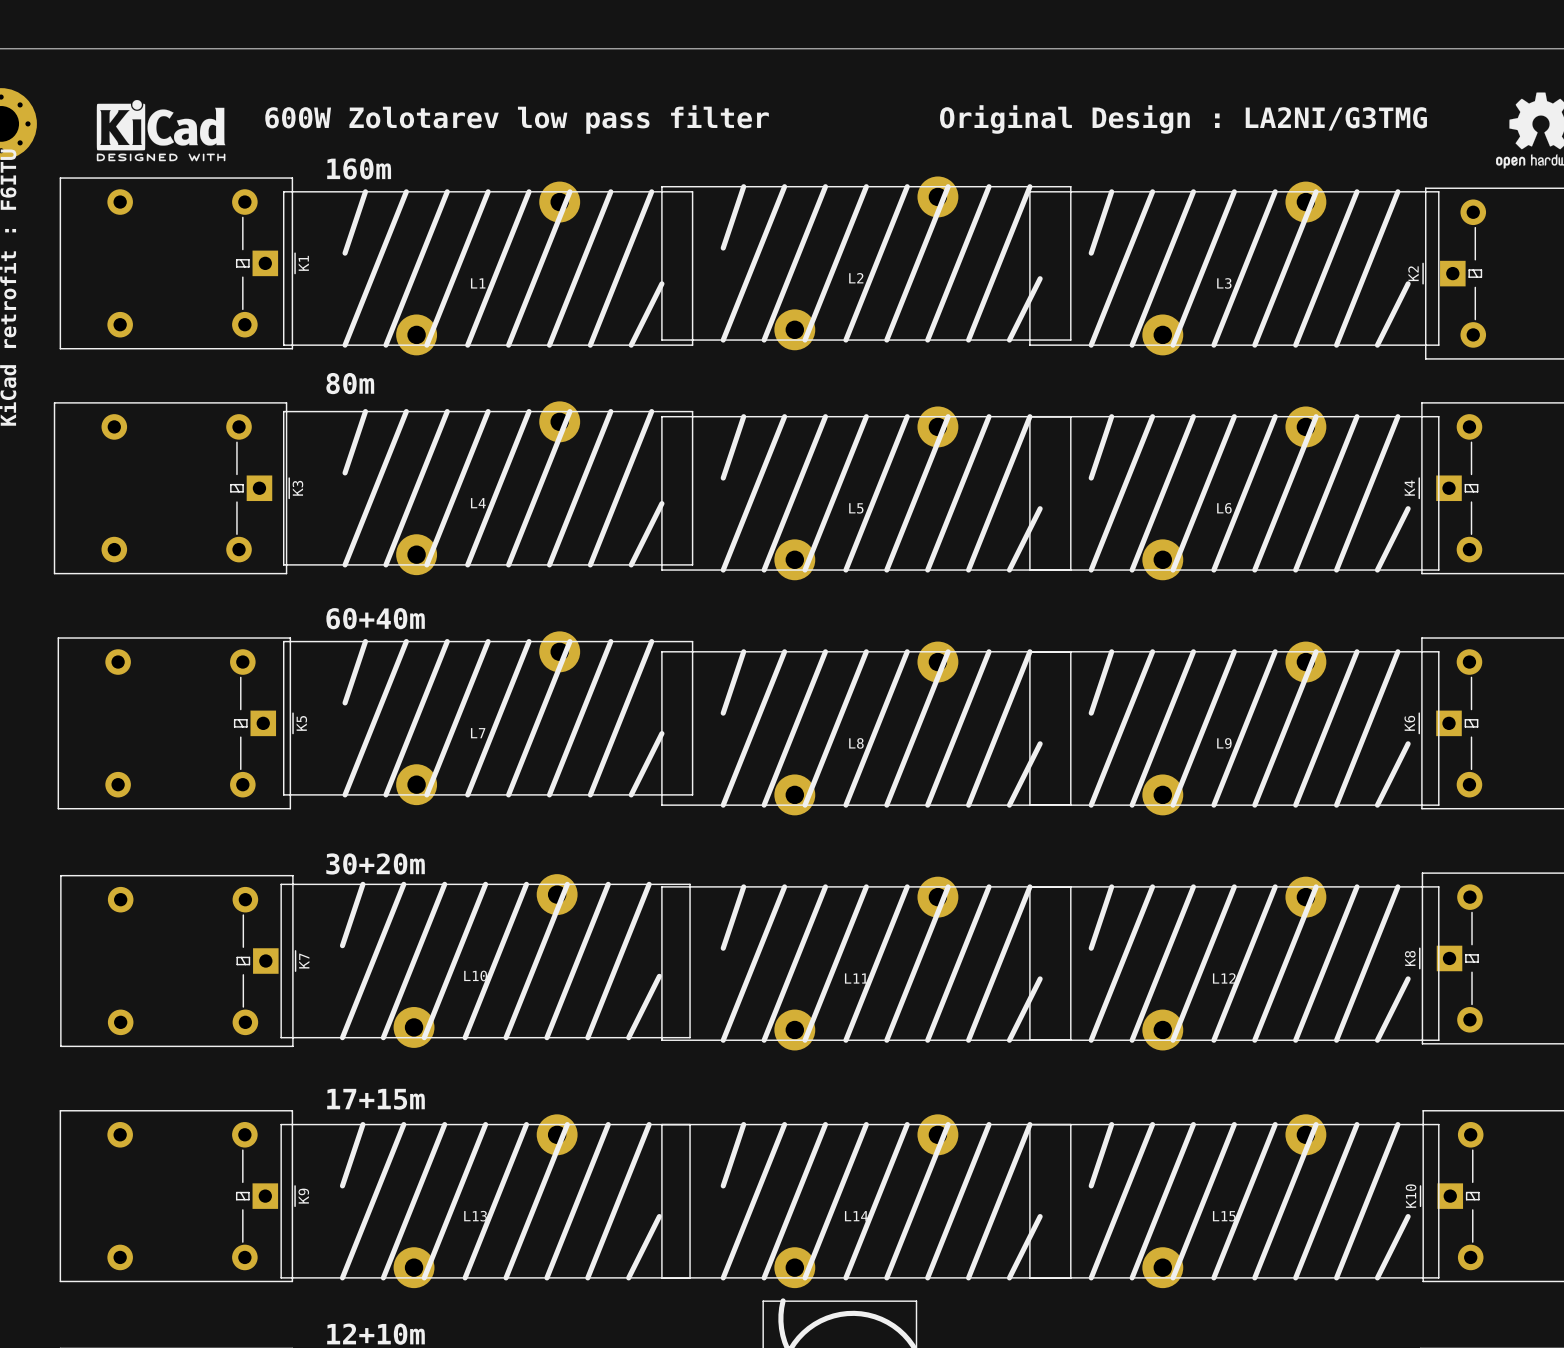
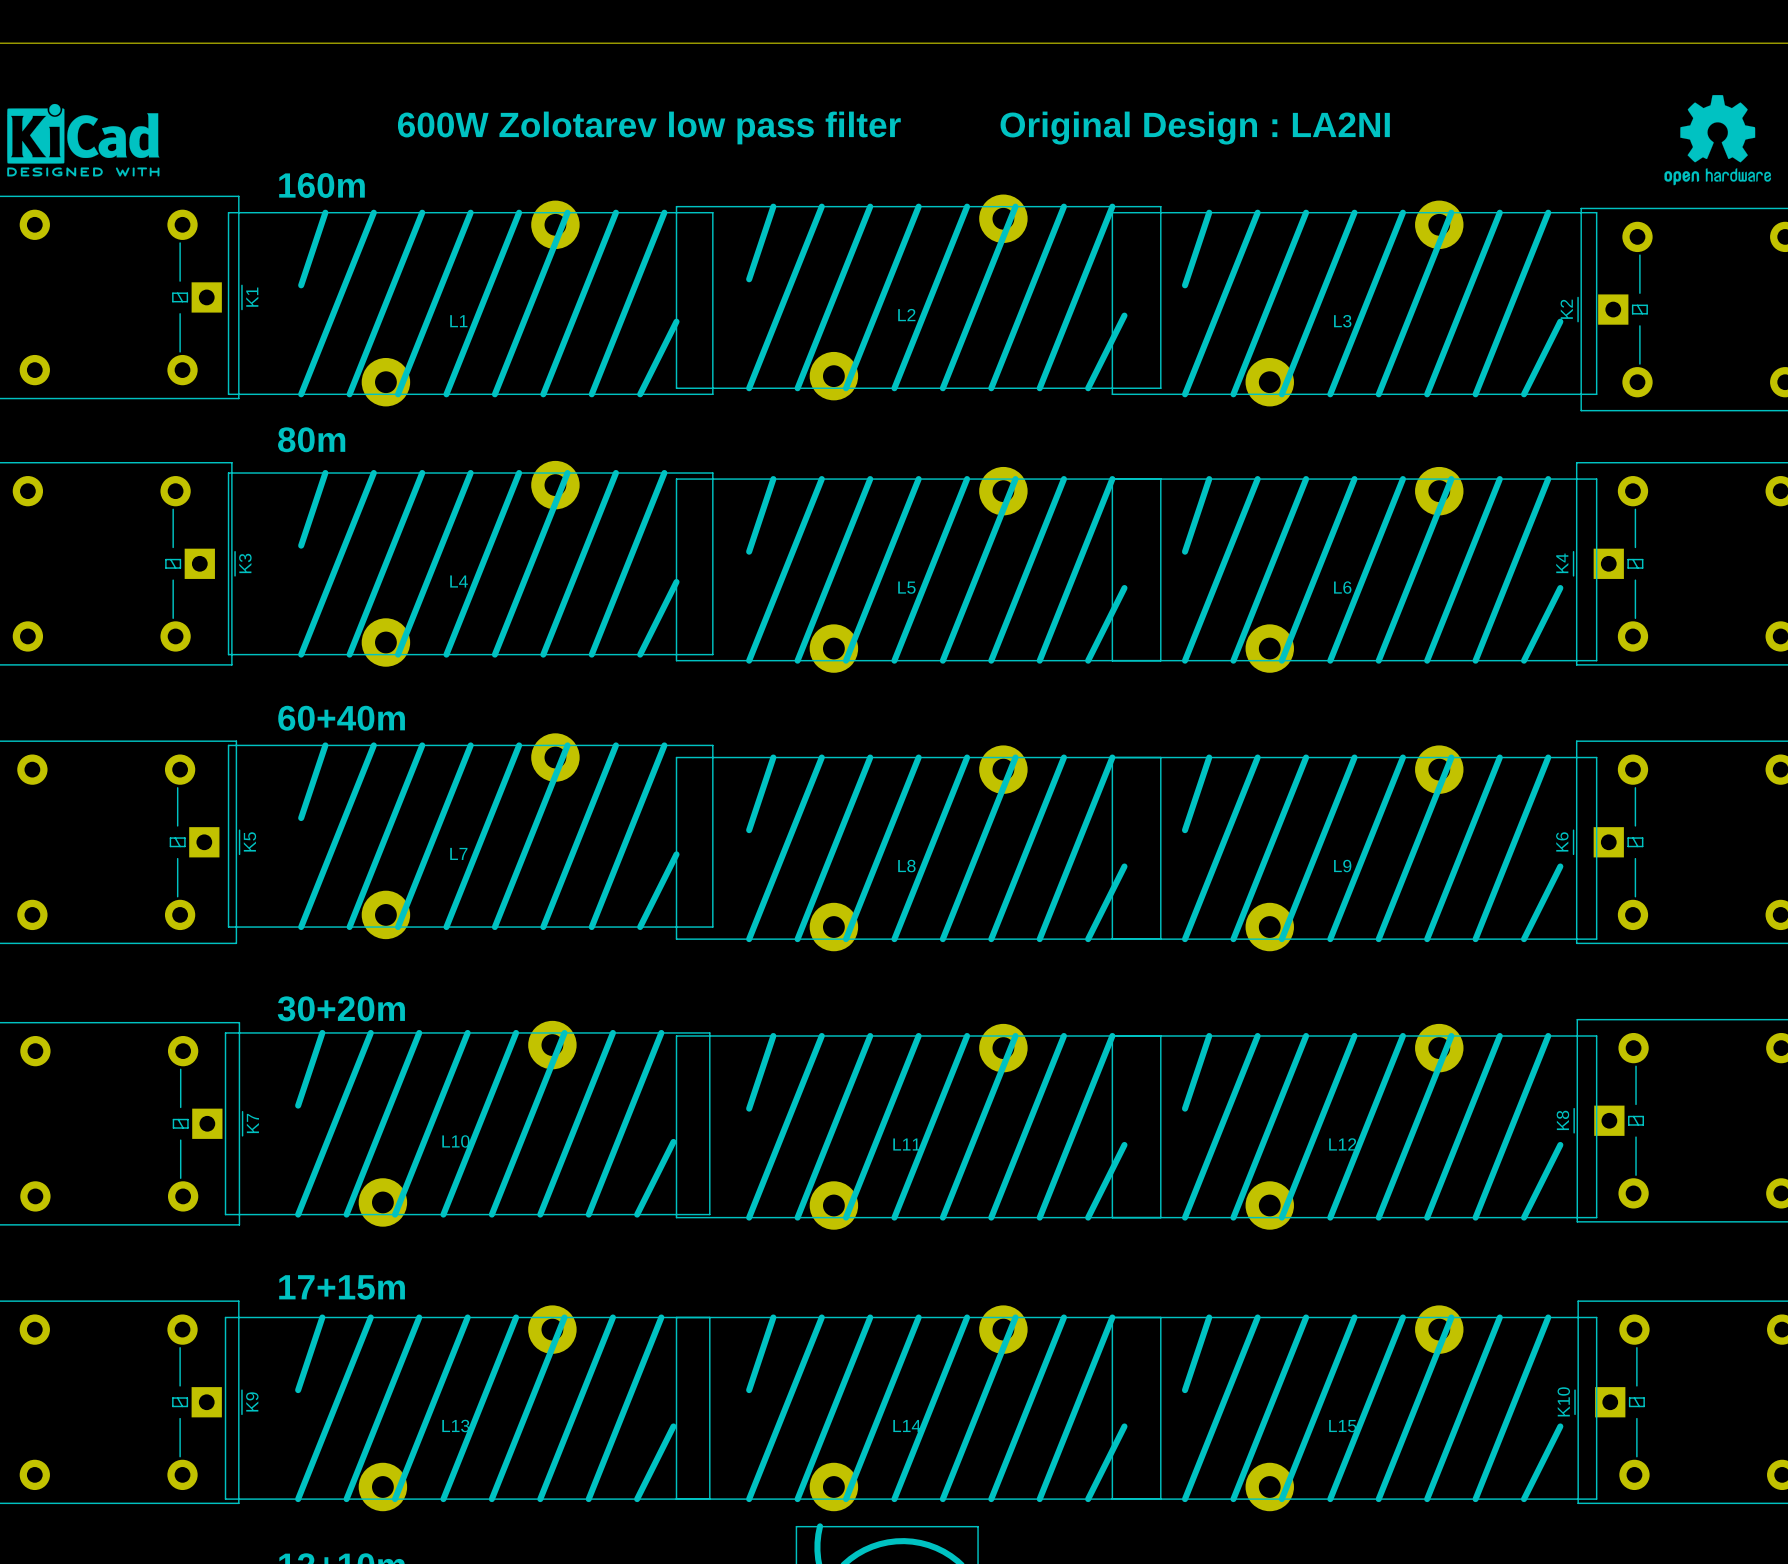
text: 600W Zolotarev low pass filter Original Design : LA2NI/G3TMG (846, 119) -> 600W Zolotarev low pass filter Original Design : LA2NI (893, 128)

